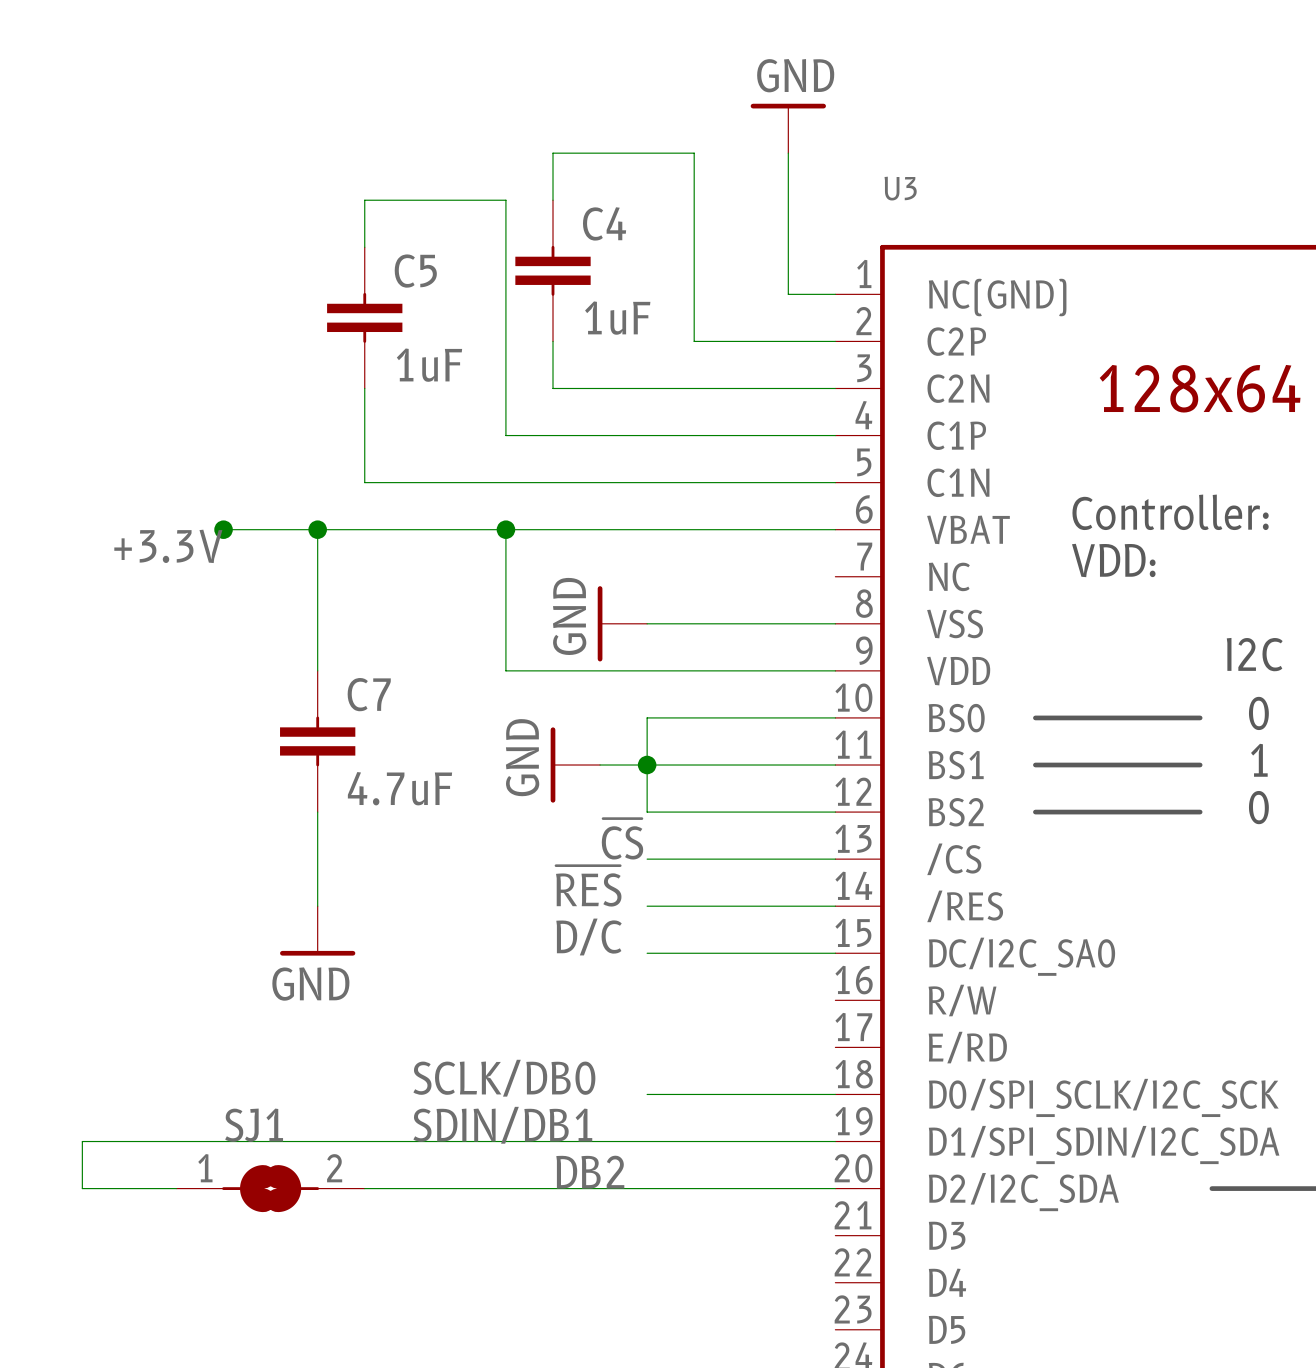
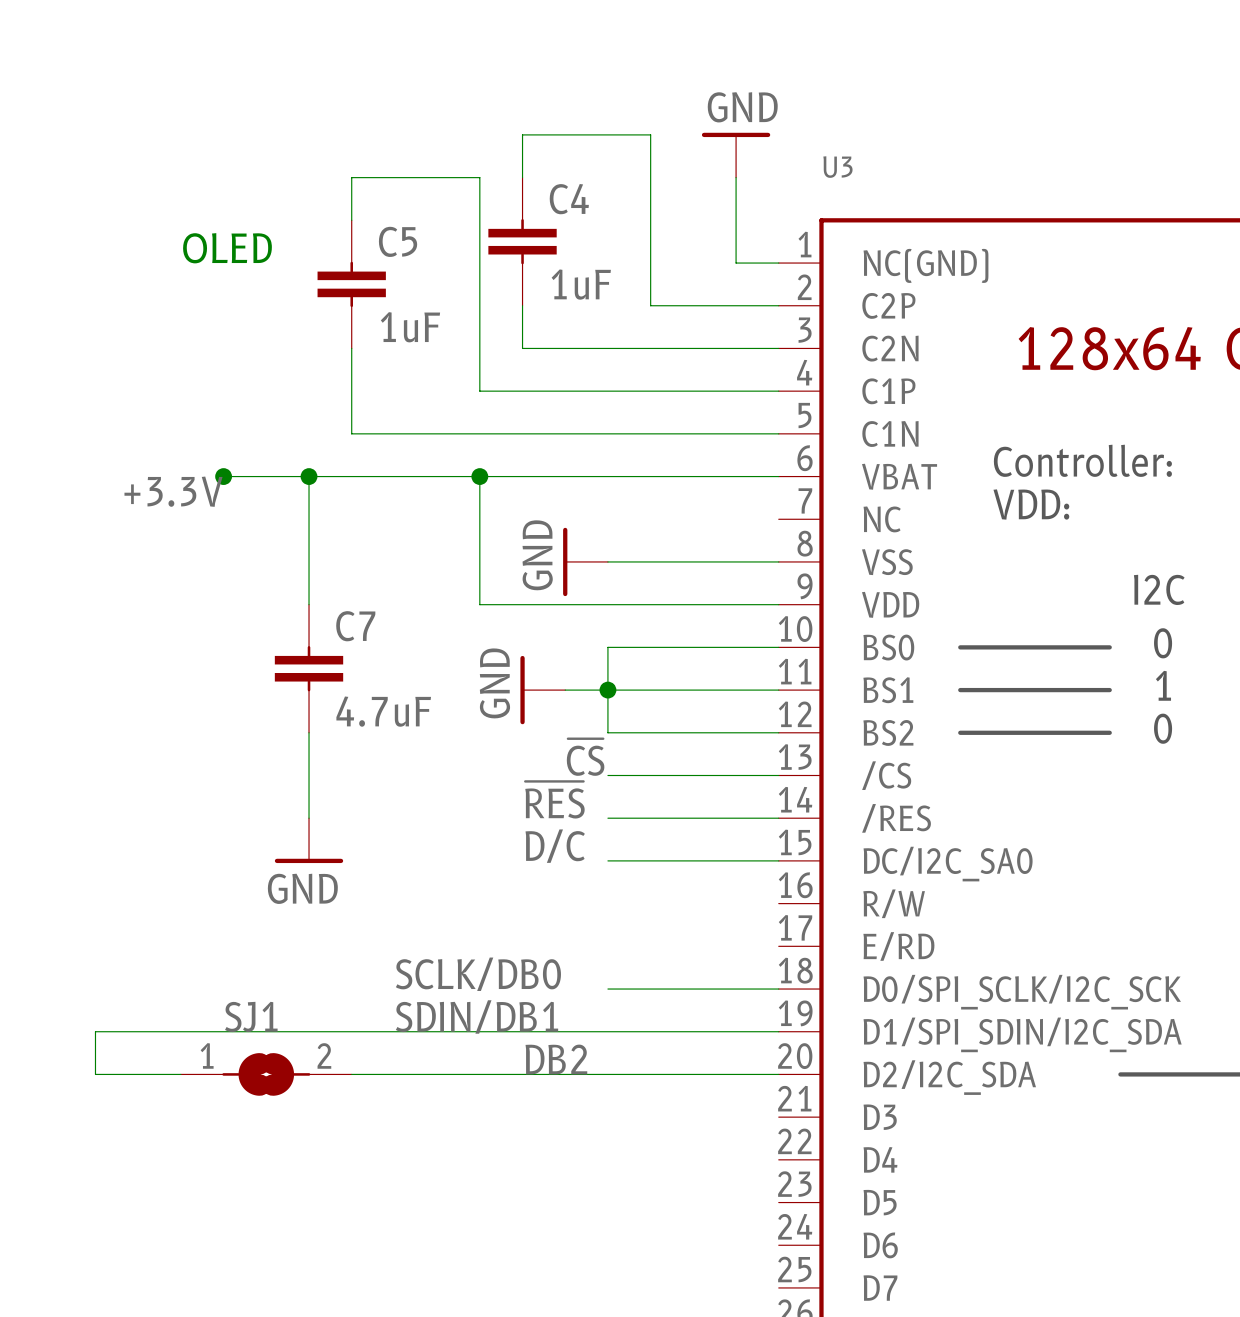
power symbol position: GND (788, 128) -> GND (736, 155)
text: none -> OLED (227, 248)

